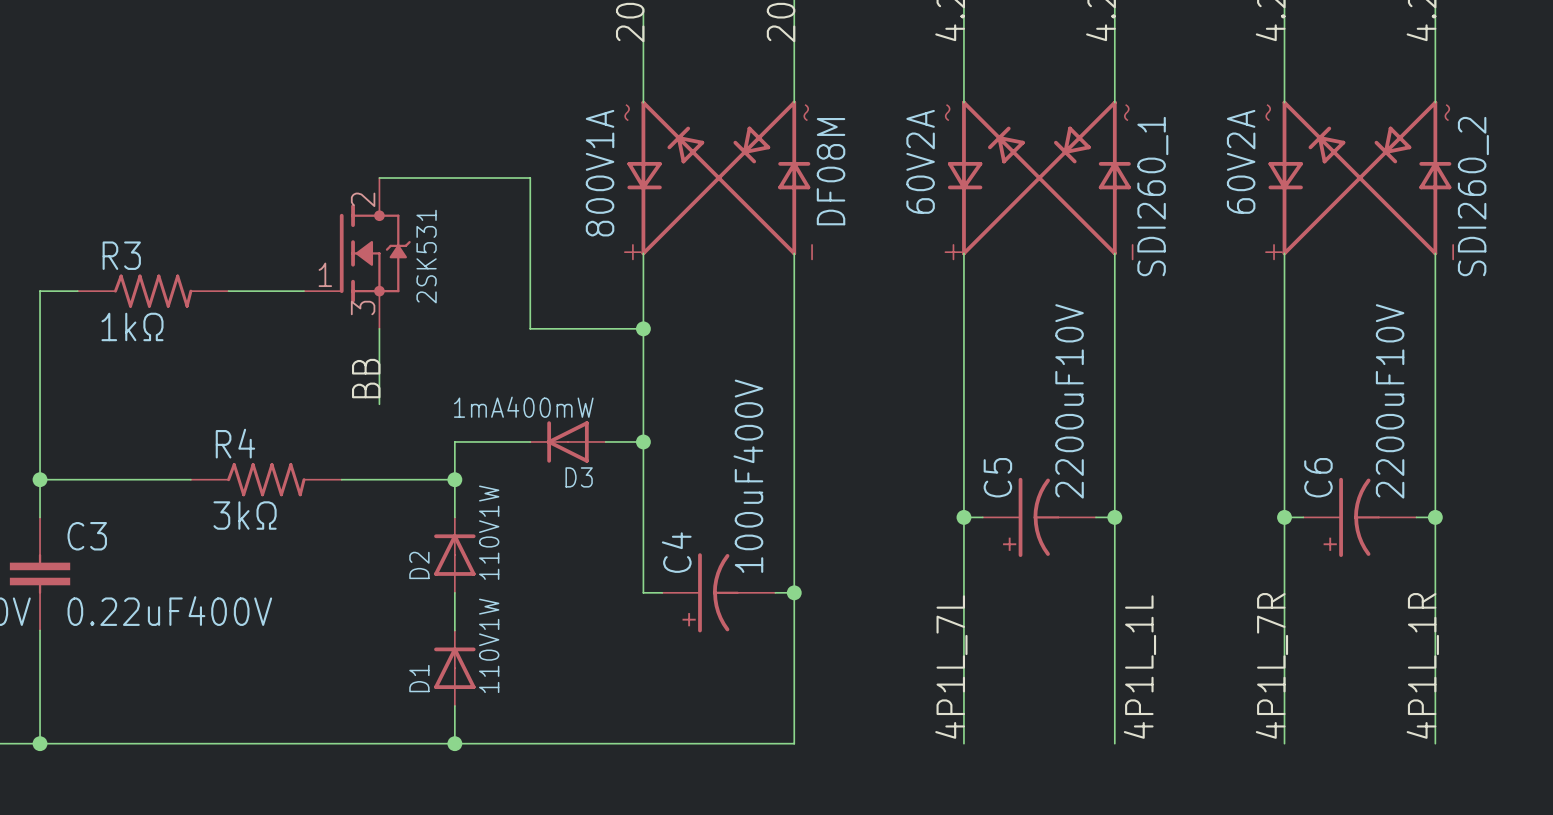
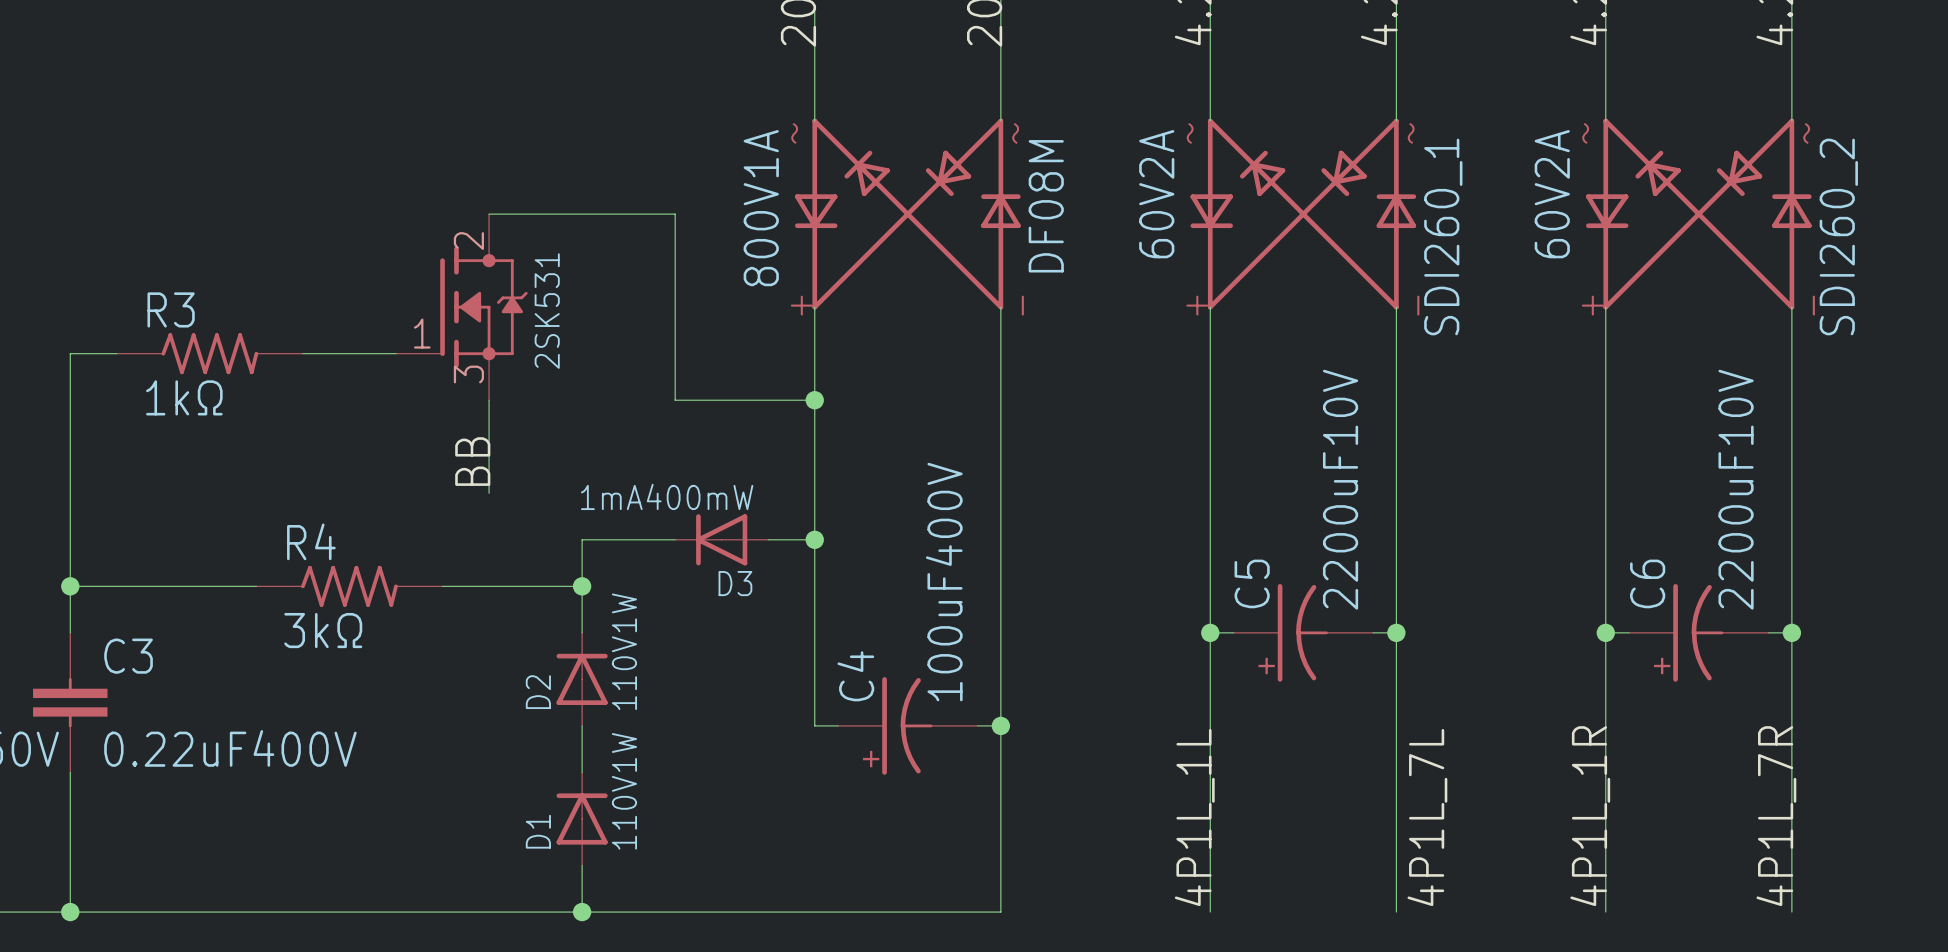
label: 4P1L_7R (1271, 665) -> 4P1L_1R (1590, 816)
label: 4P1L_1R (1422, 665) -> 4P1L_7R (1776, 816)
label: 4P1L_7L (951, 667) -> 4P1L_1L (1194, 817)
label: 4P1L_1L (1139, 667) -> 4P1L_7L (1427, 817)

